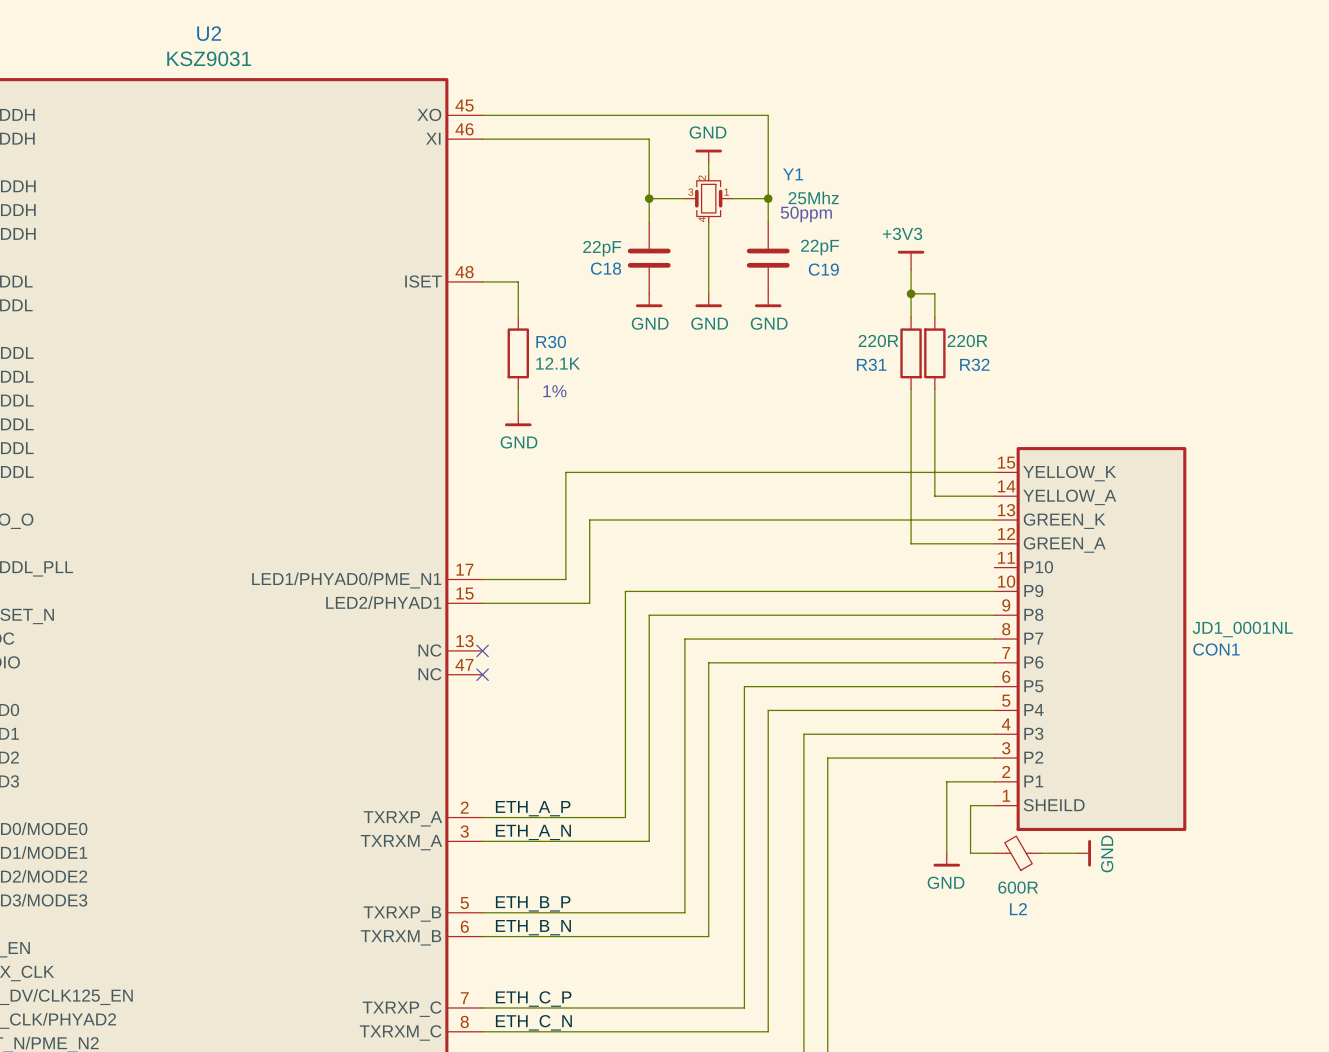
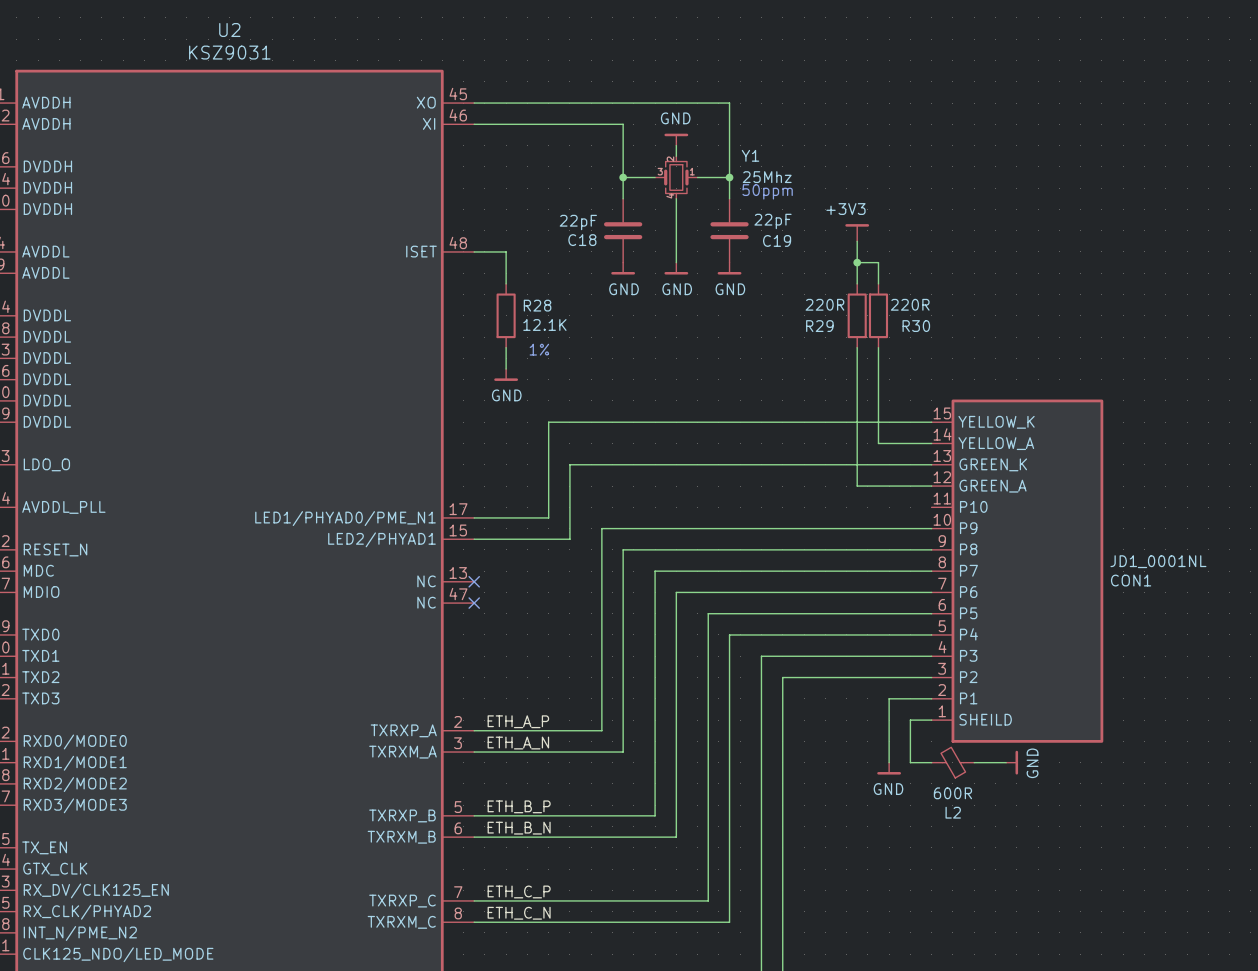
R30 name: R30 (551, 341) -> R28 (537, 305)
R31 name: R31 (871, 364) -> R29 (819, 326)
R32 name: R32 (974, 364) -> R30 (916, 326)

